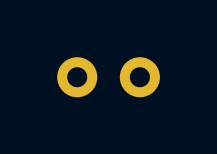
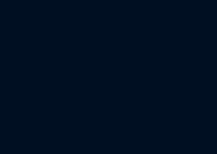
part: (108, 77) -> none

